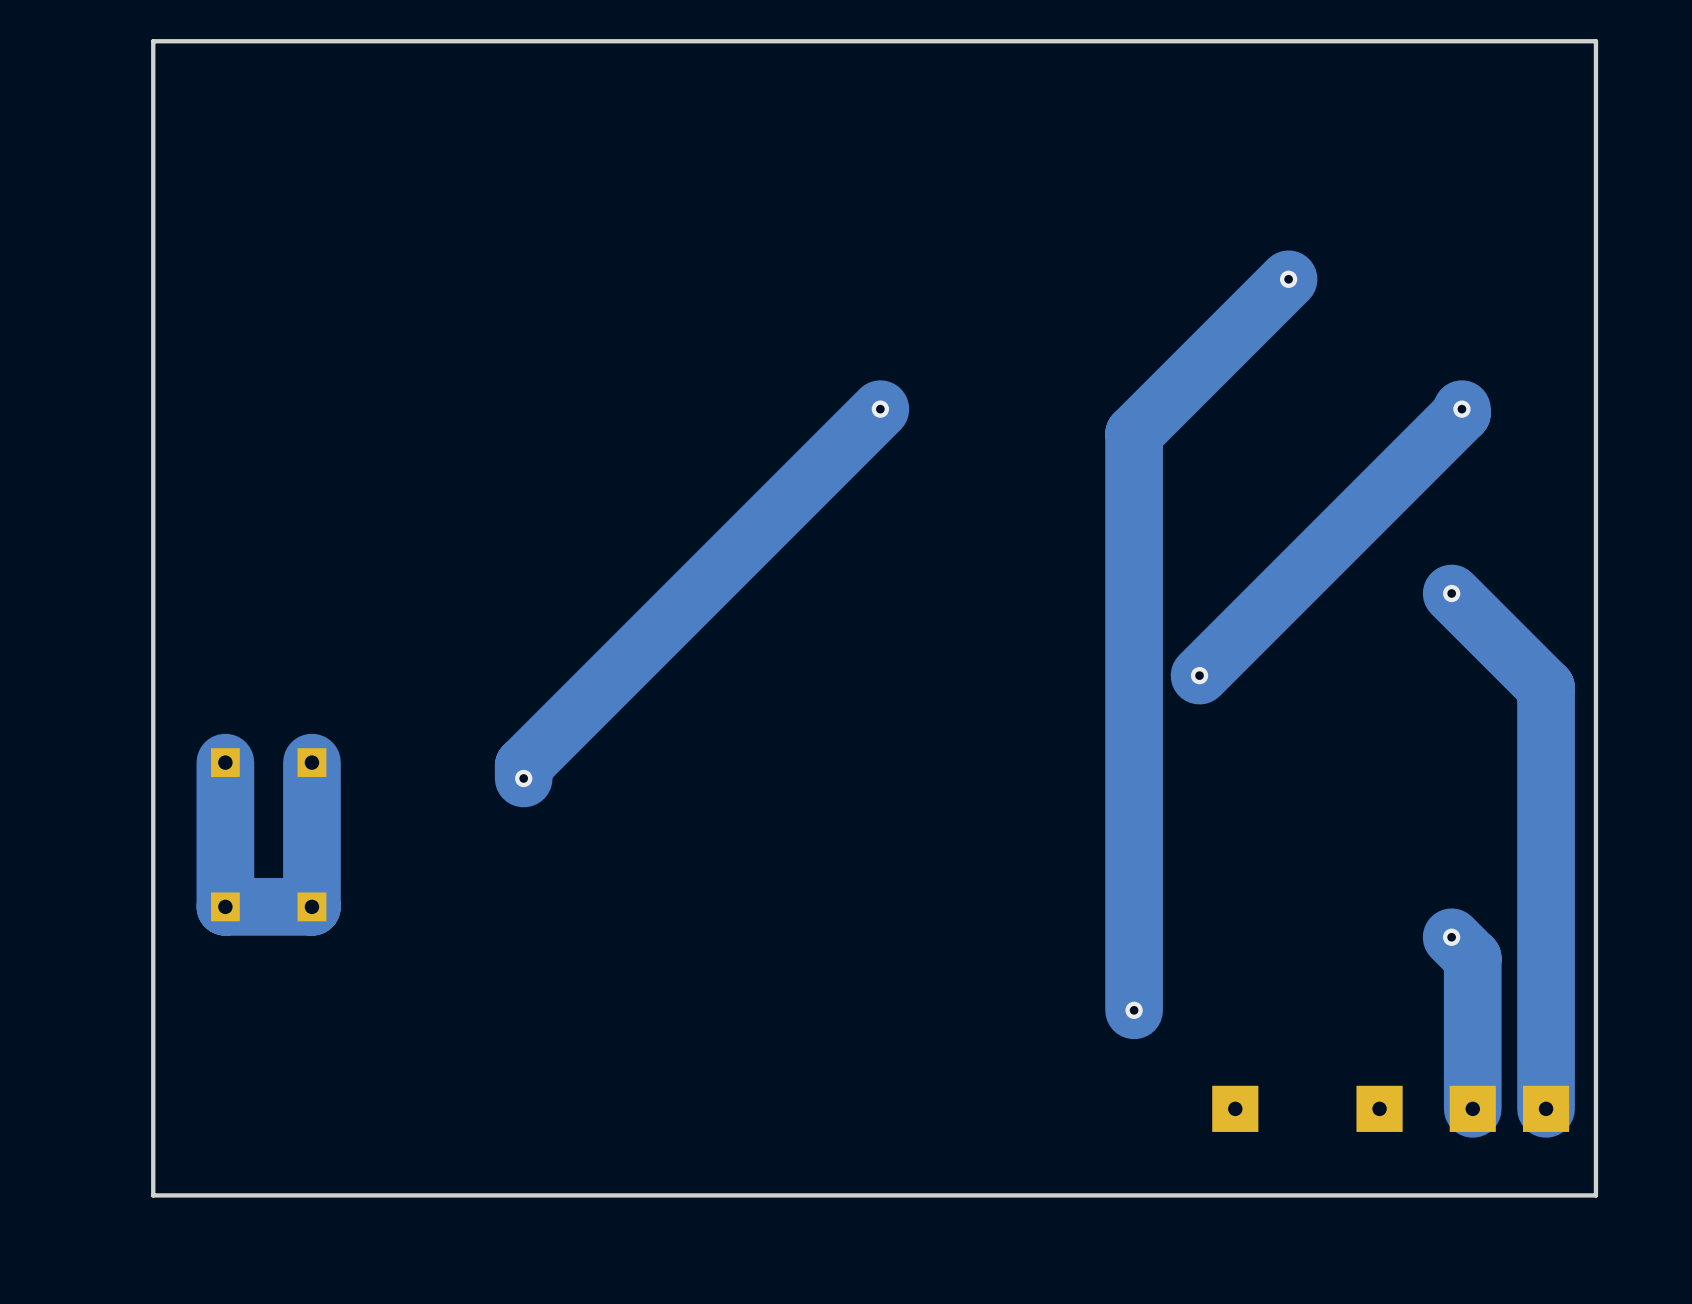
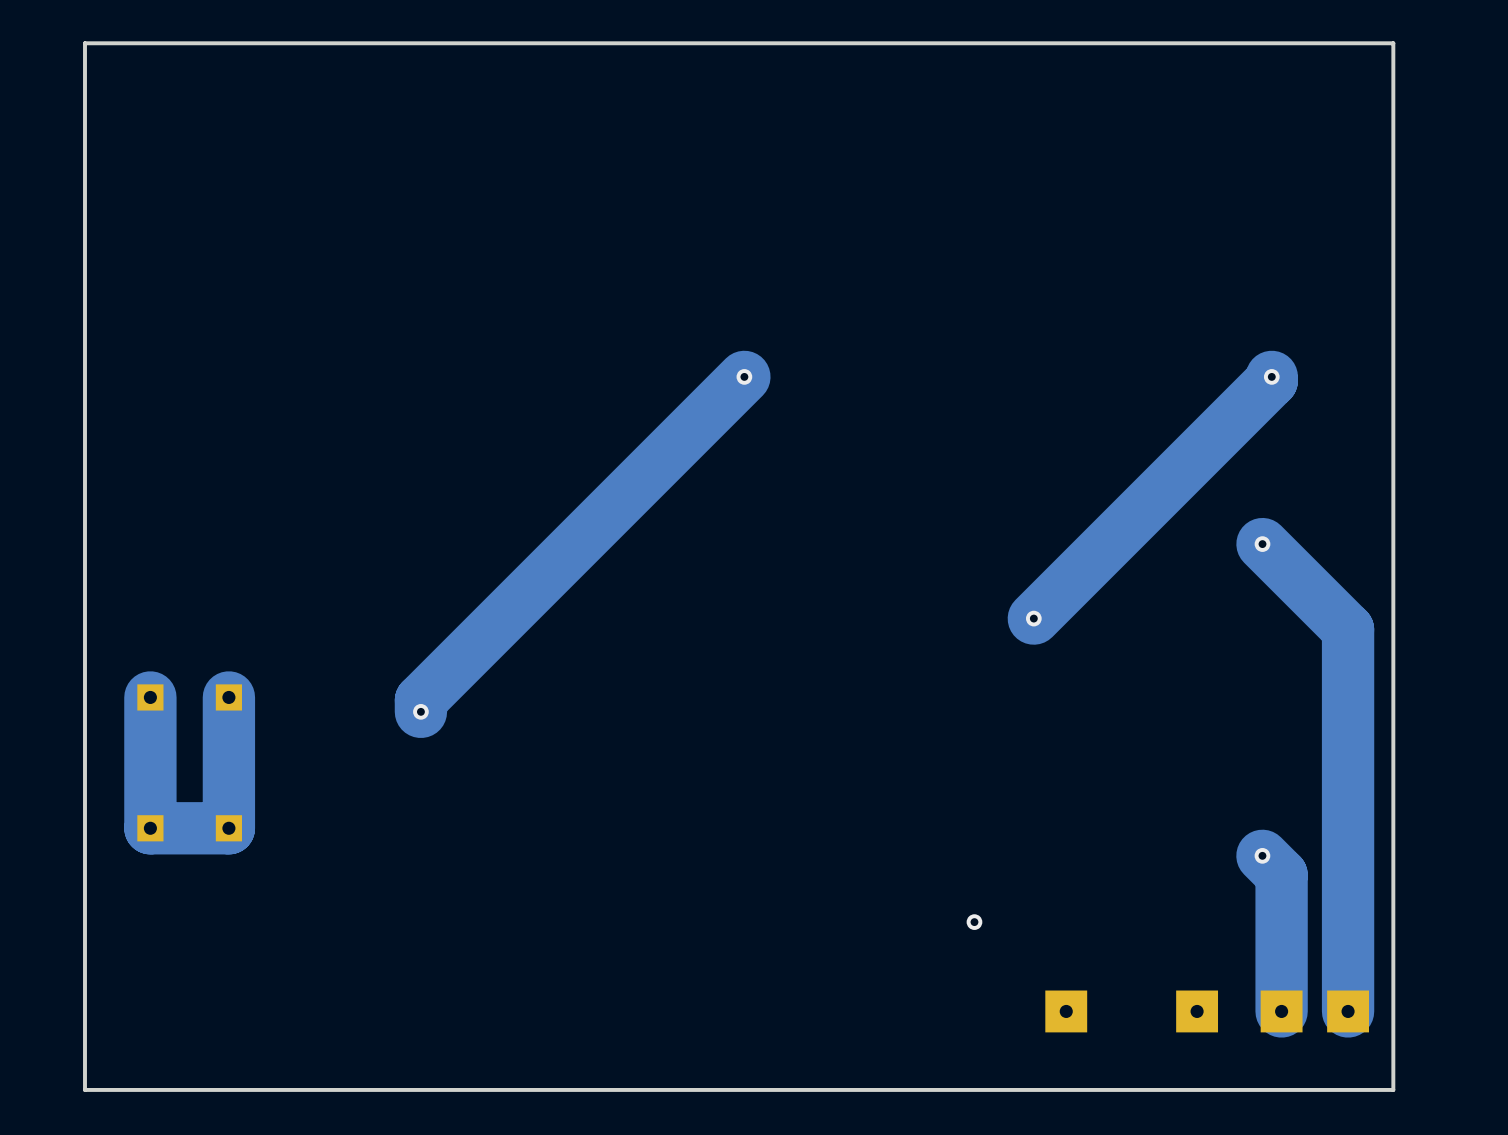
track: (1288, 279) (1134, 433) (1134, 1010) -> none
via: (1288, 279) -> none

